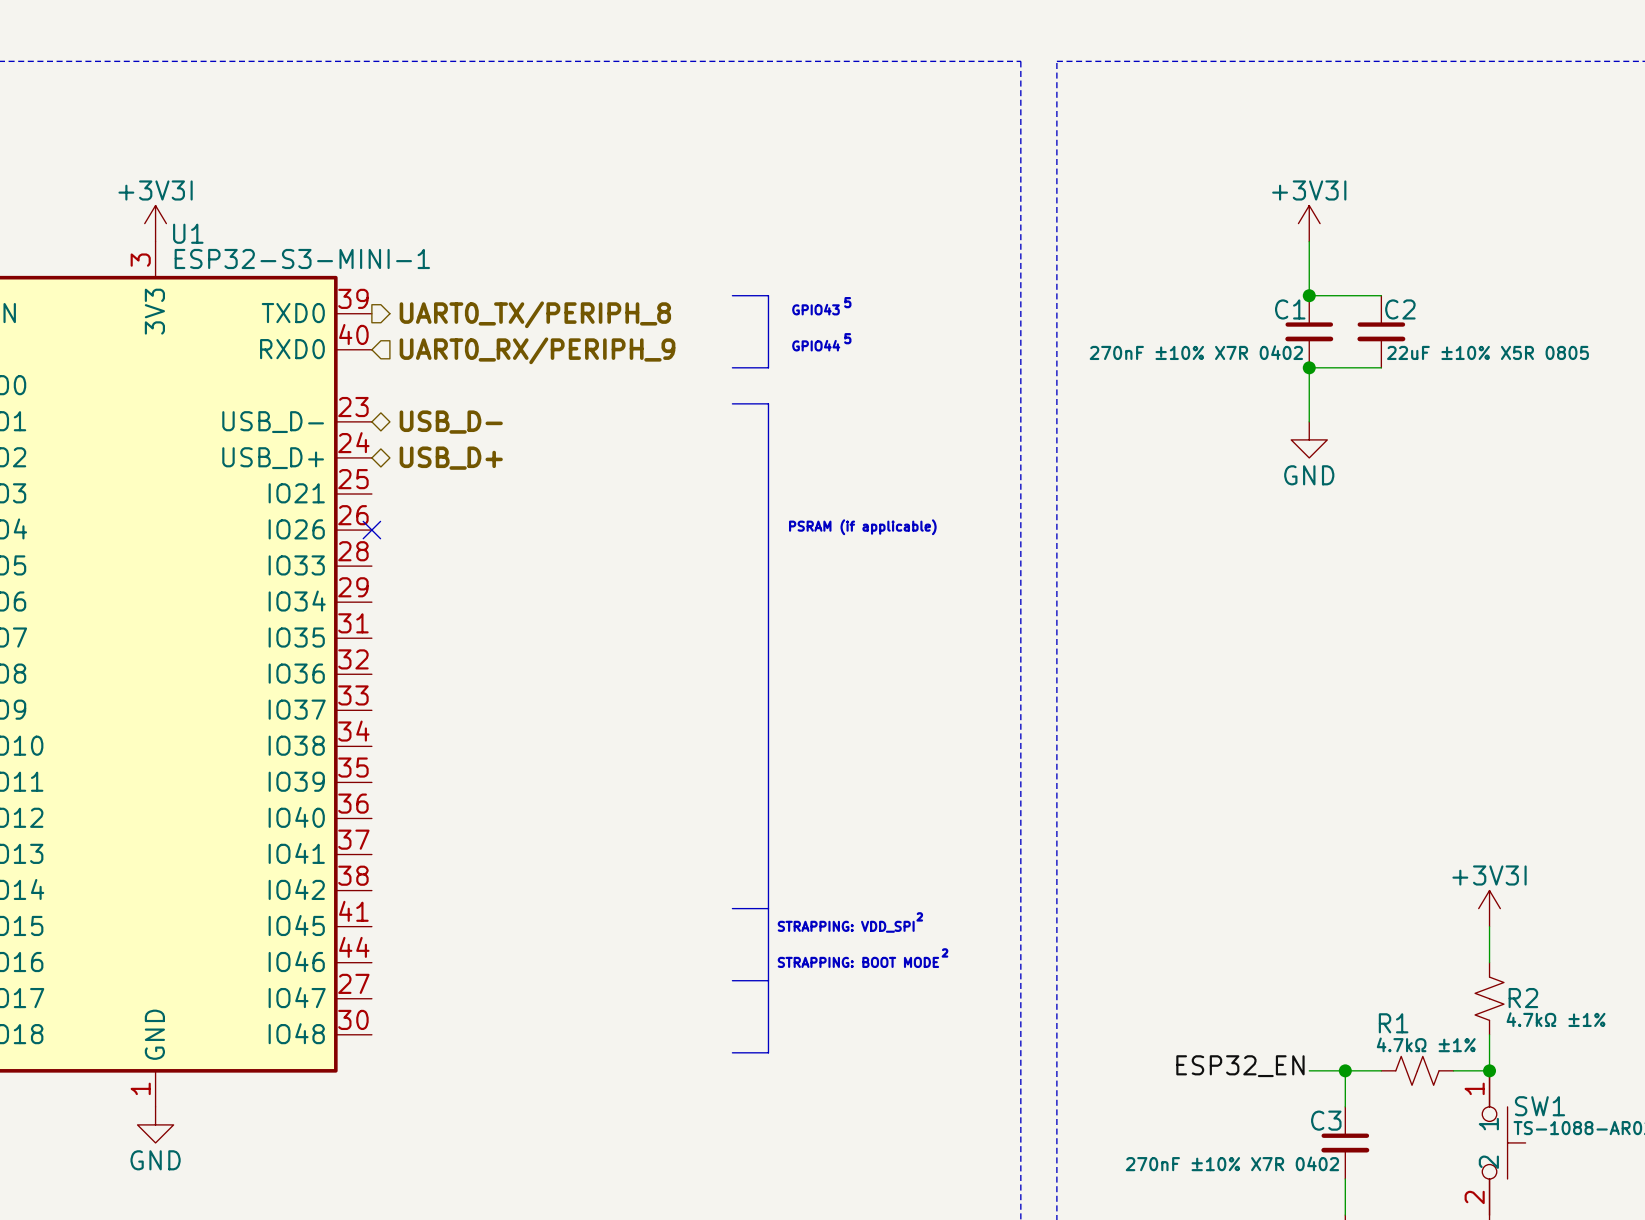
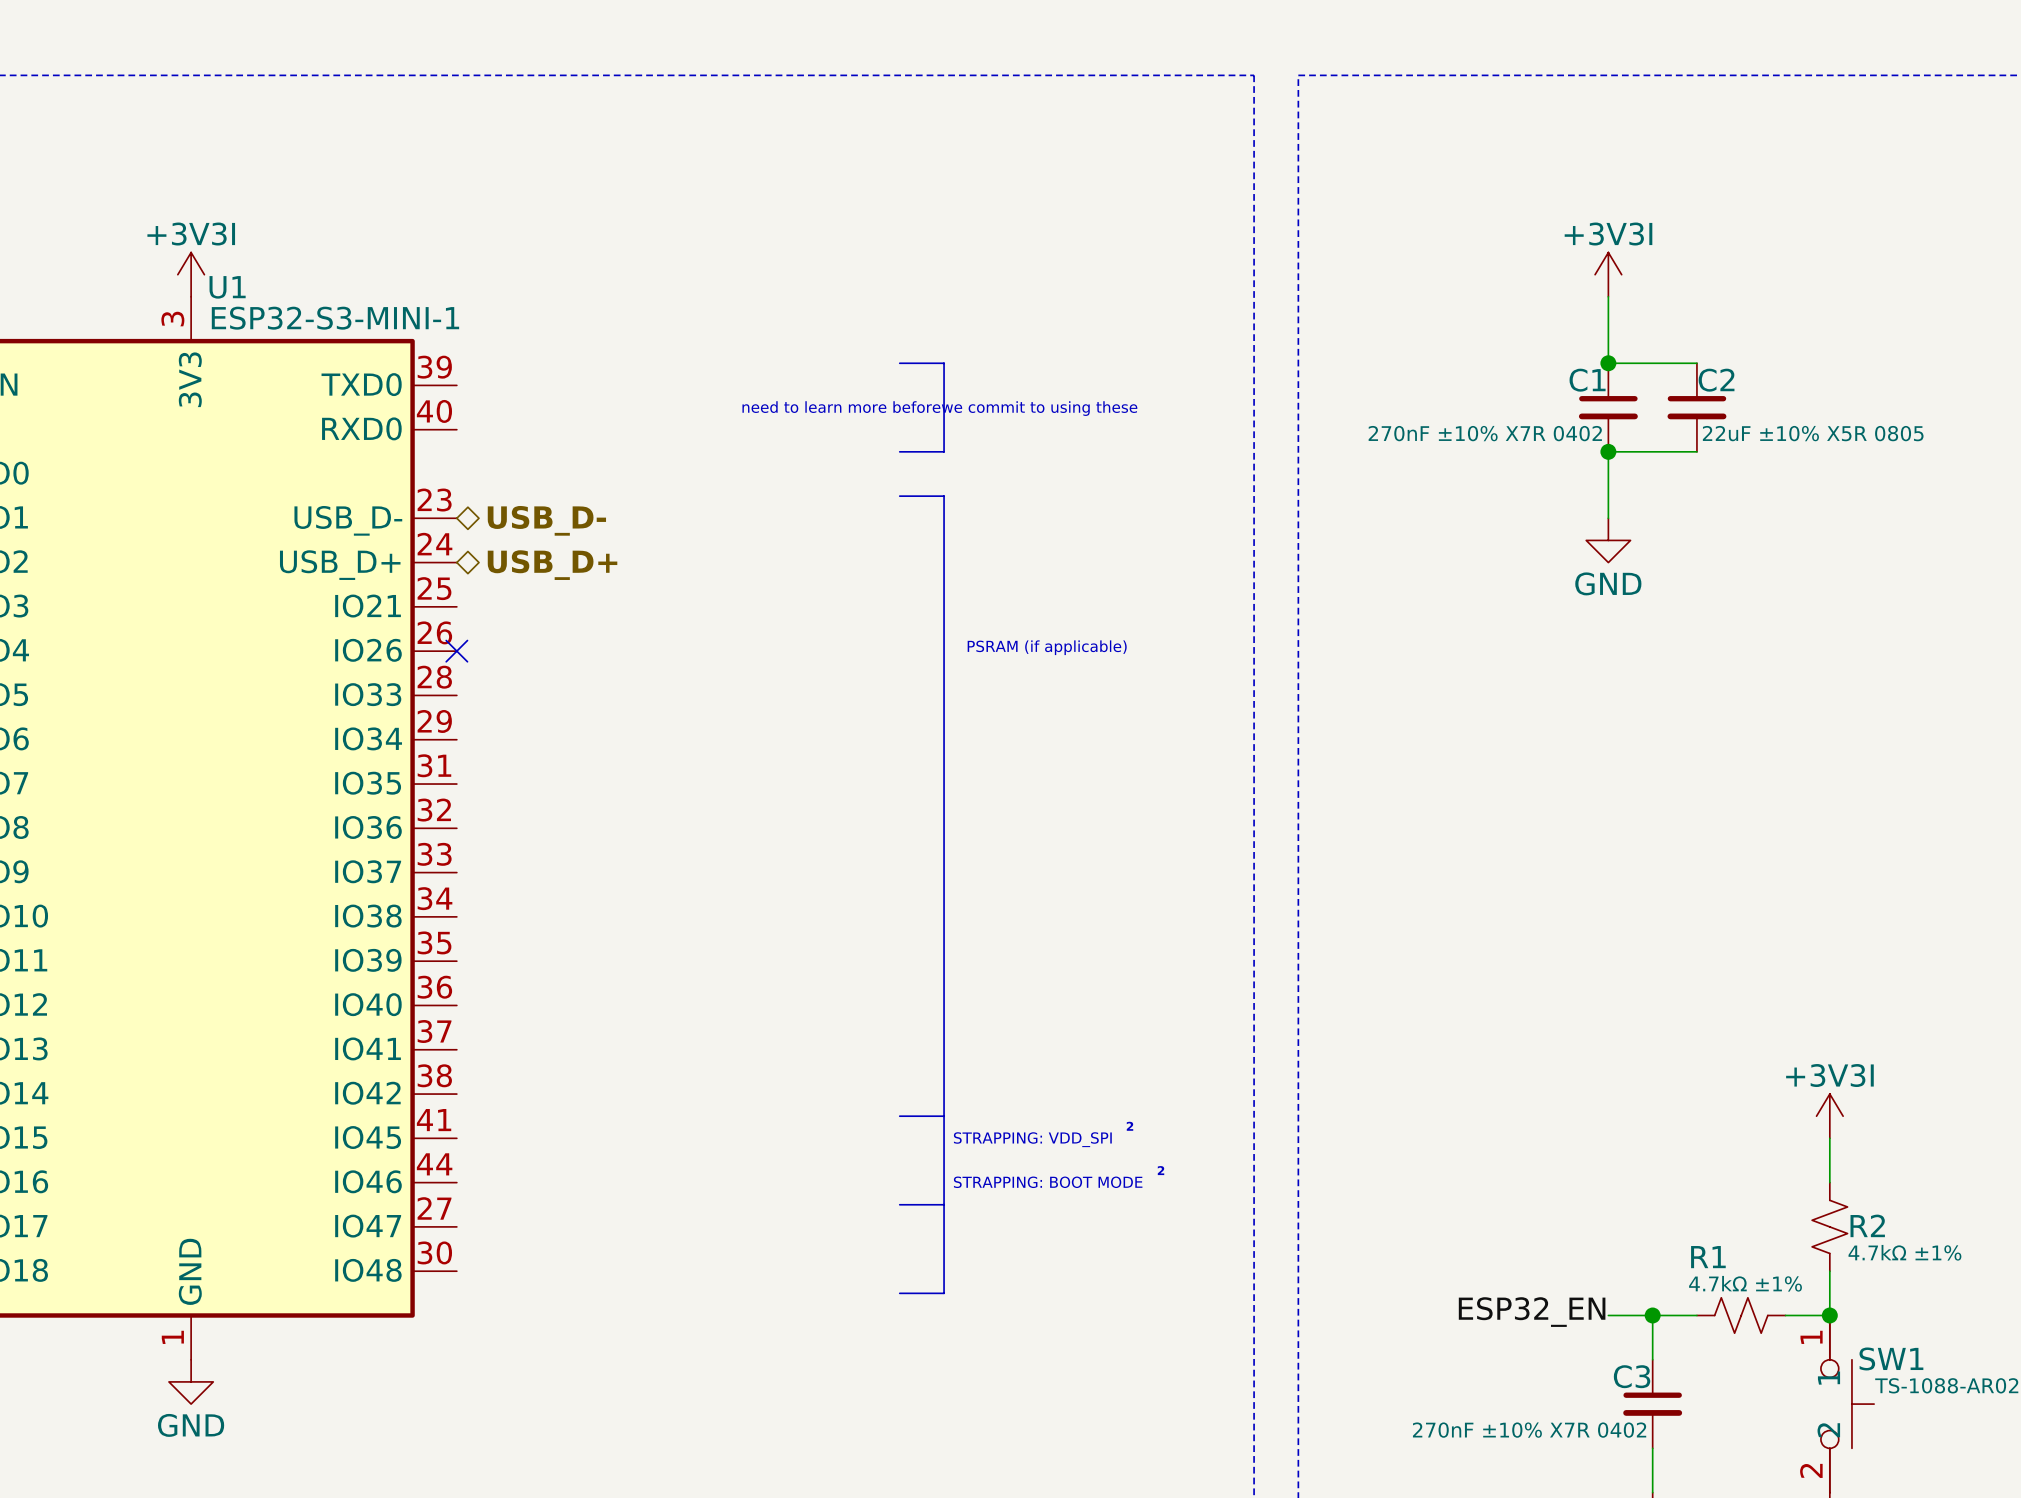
text: 5 (847, 302) -> none
text: GPIO43 (815, 309) -> none
hierarchical label: UART0_TX/PERIPH_8 (535, 314) -> none
text: none -> need to learn more beforewe commit to using these (939, 408)
text: 5 (847, 338) -> none
text: GPIO44 (816, 345) -> none
hierarchical label: UART0_RX/PERIPH_9 (537, 350) -> none

